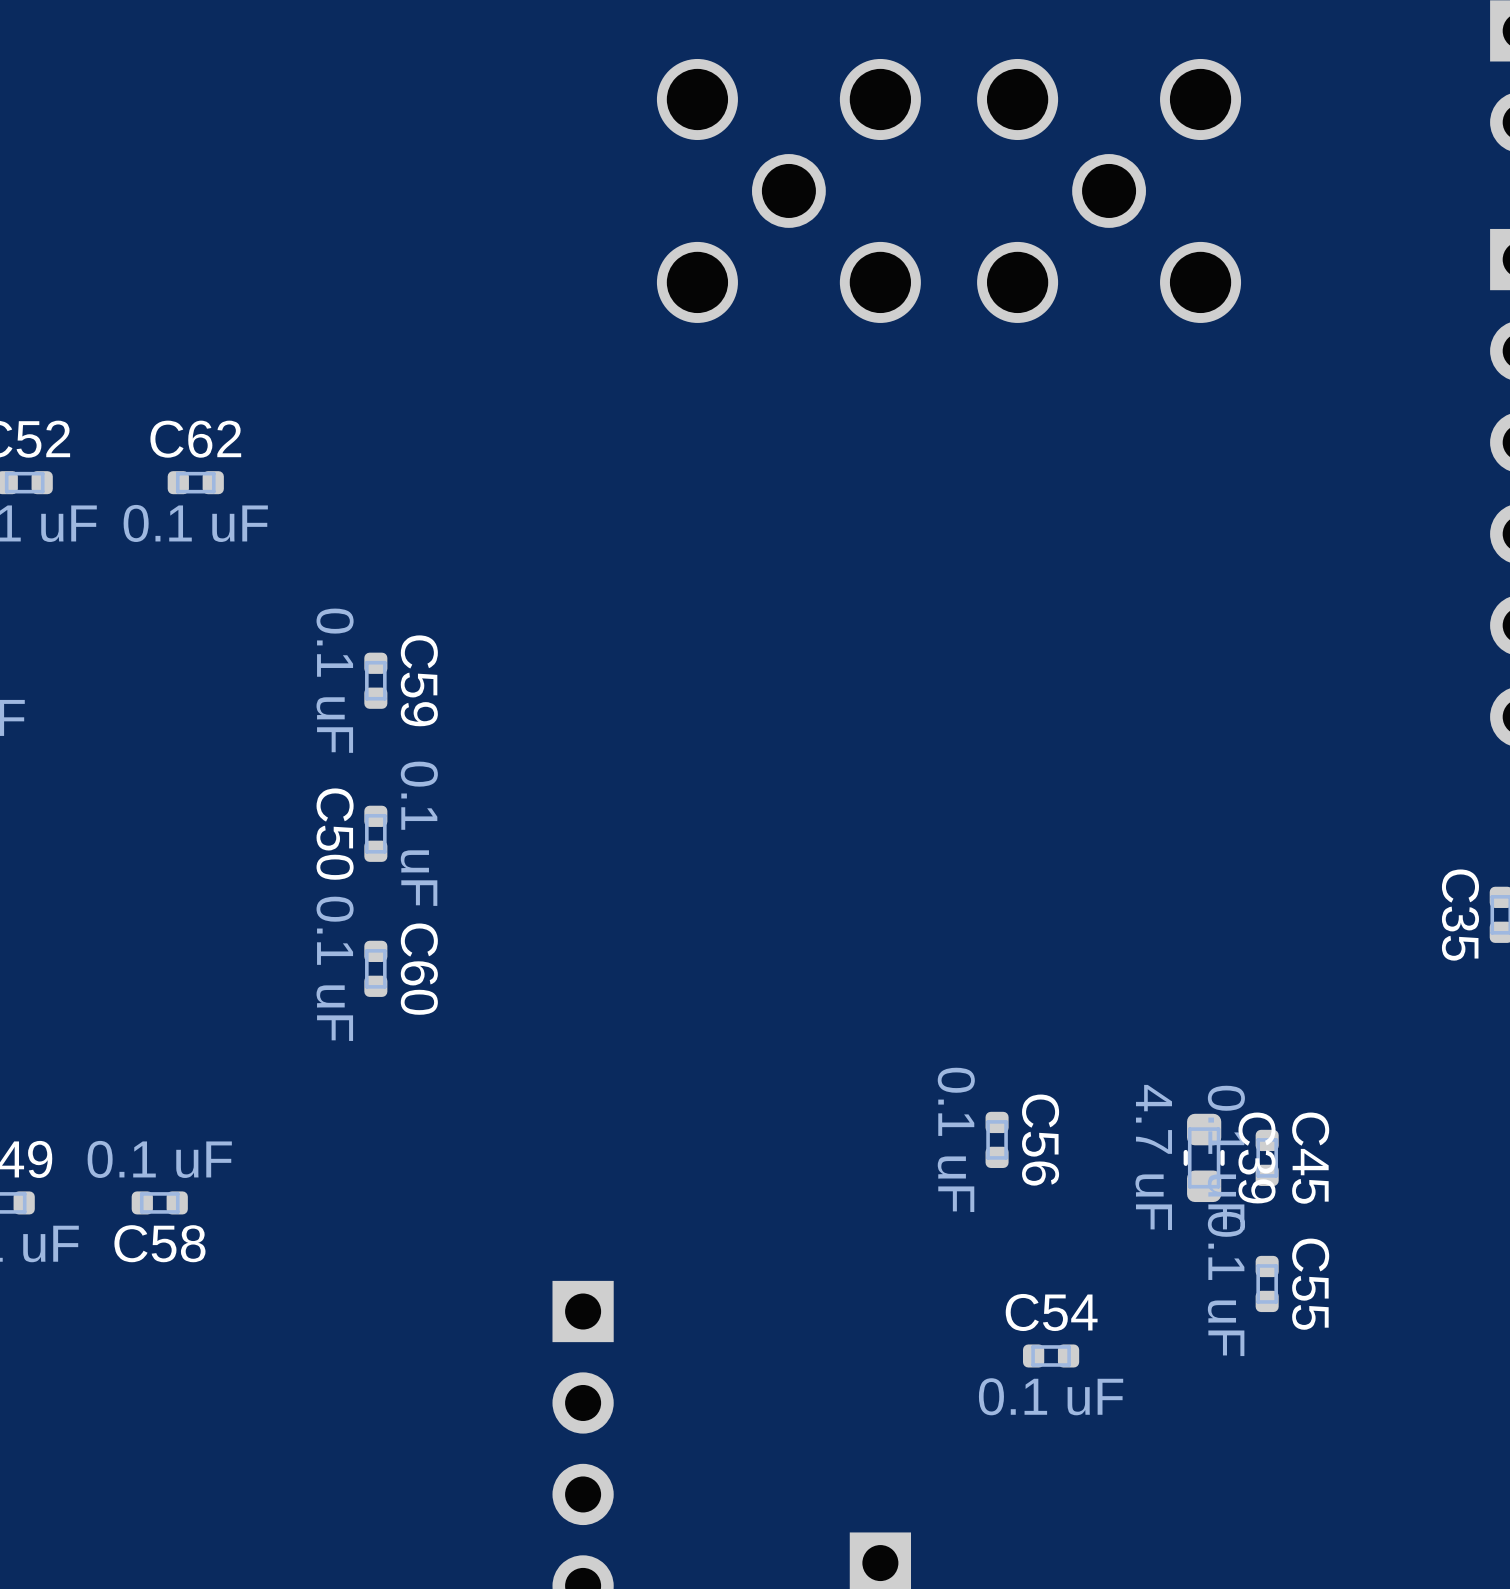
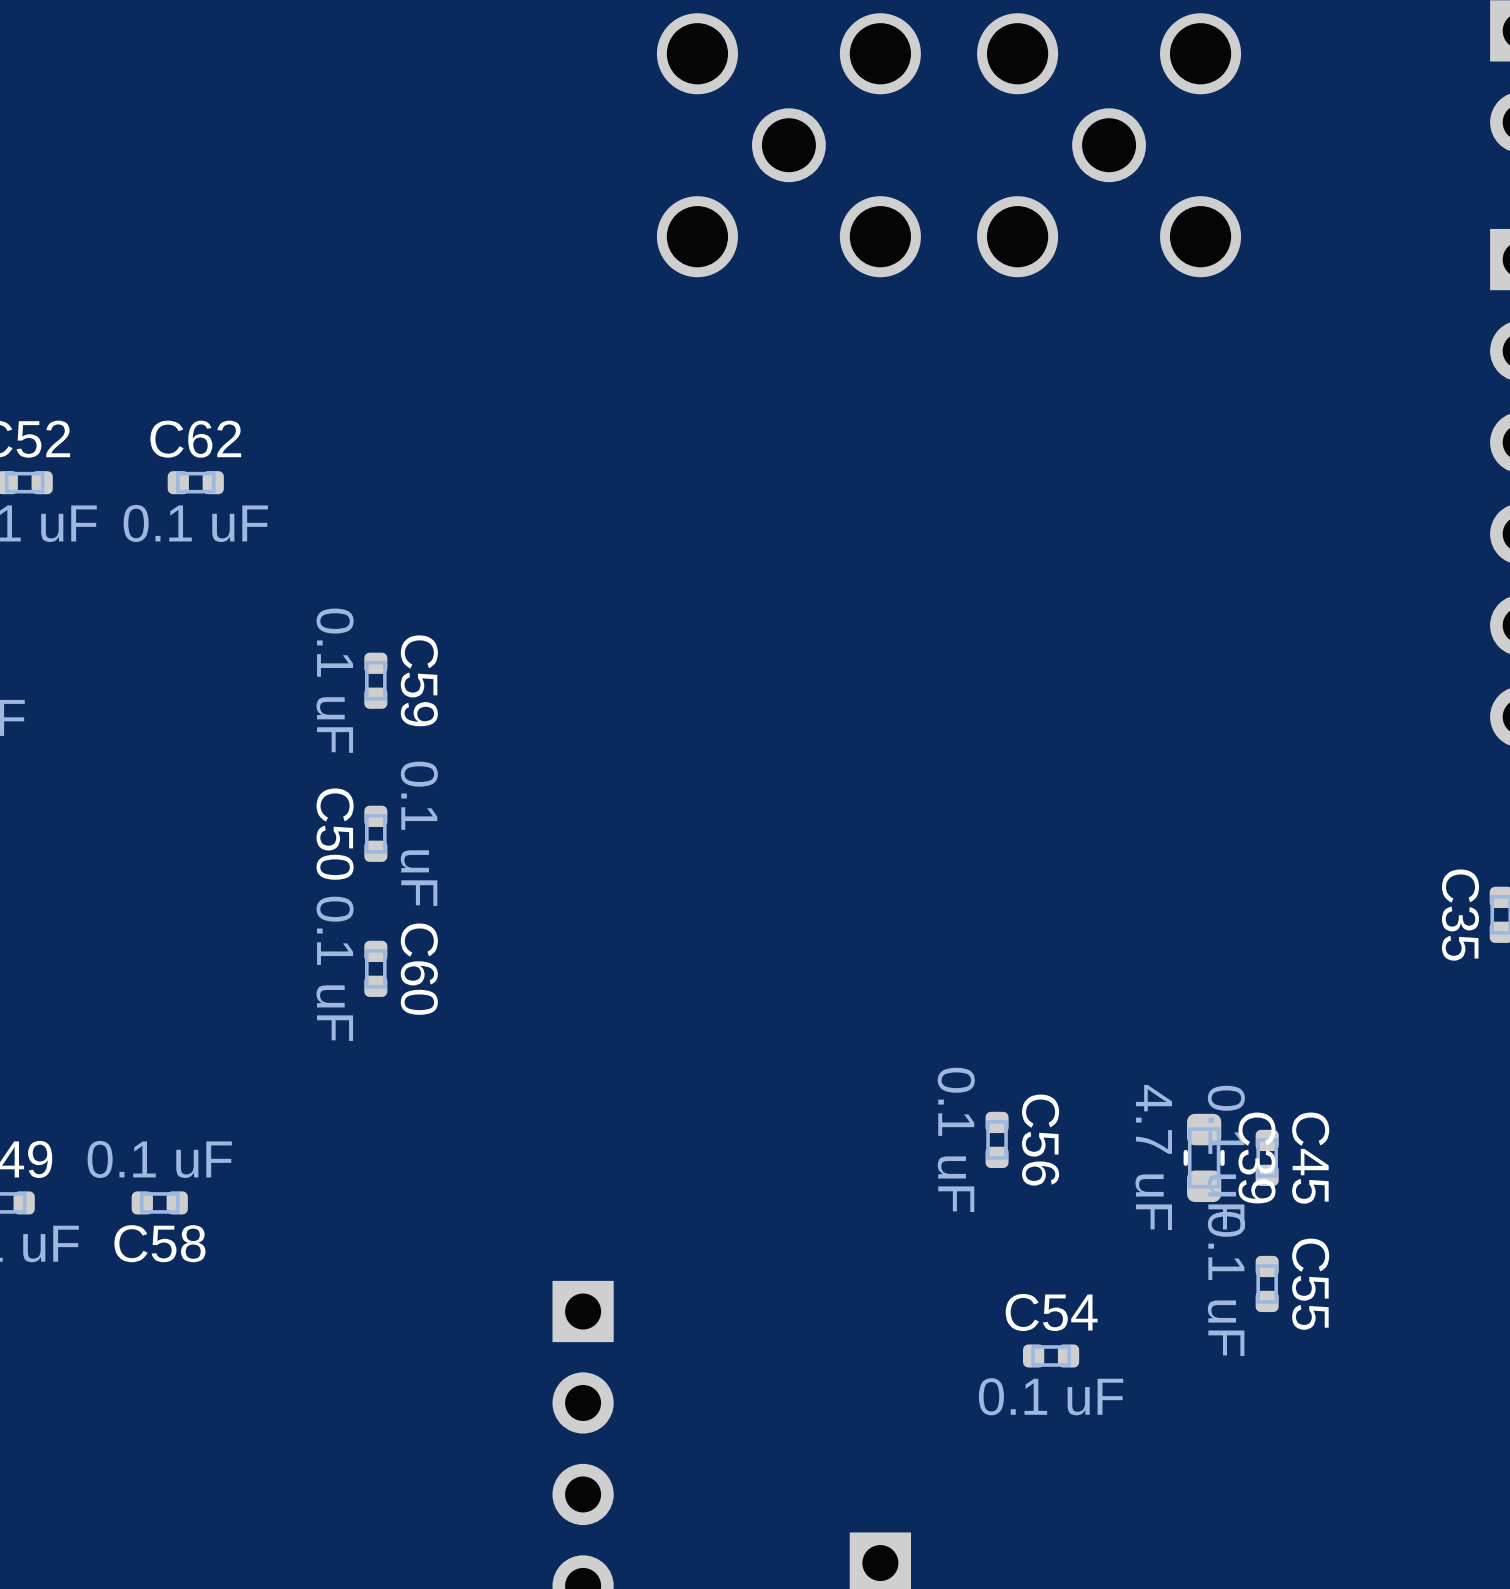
part position: (788, 190) -> (788, 145)
part position: (1109, 190) -> (1109, 145)

